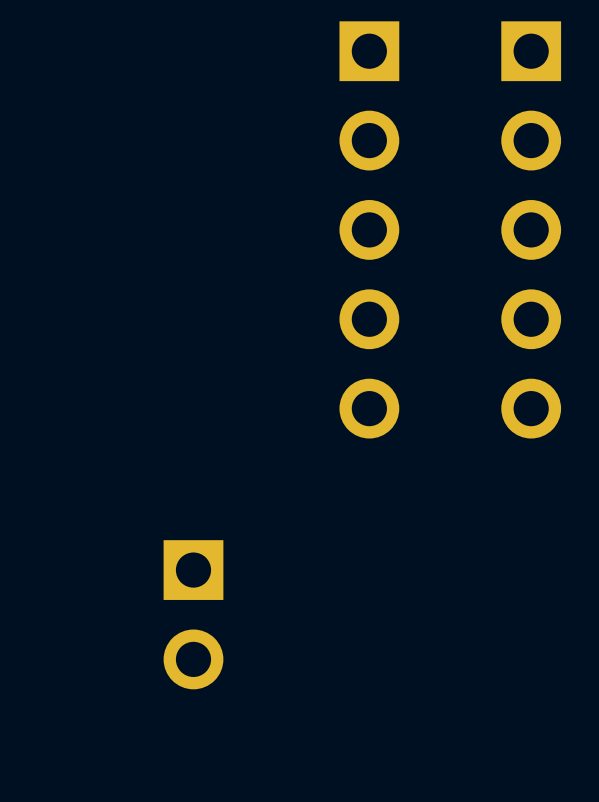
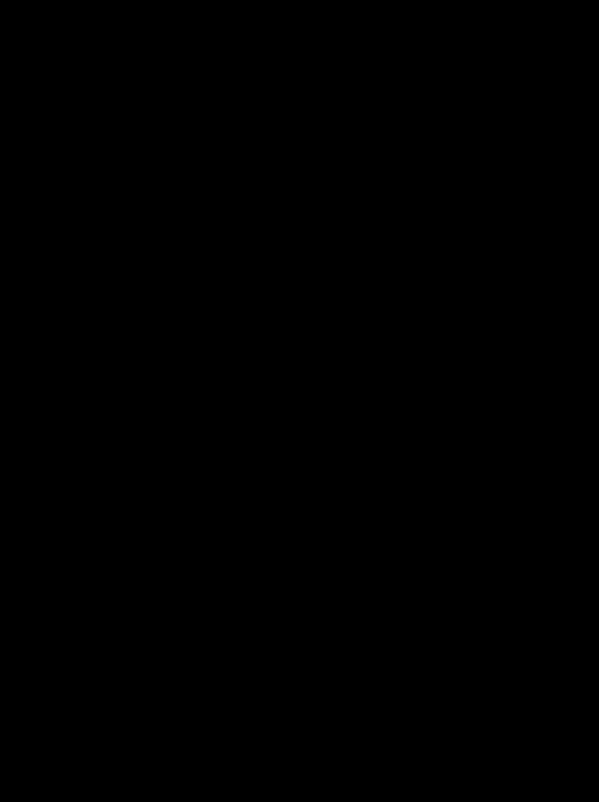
part: (369, 229) -> none
part: (531, 229) -> none
part: (193, 614) -> none

